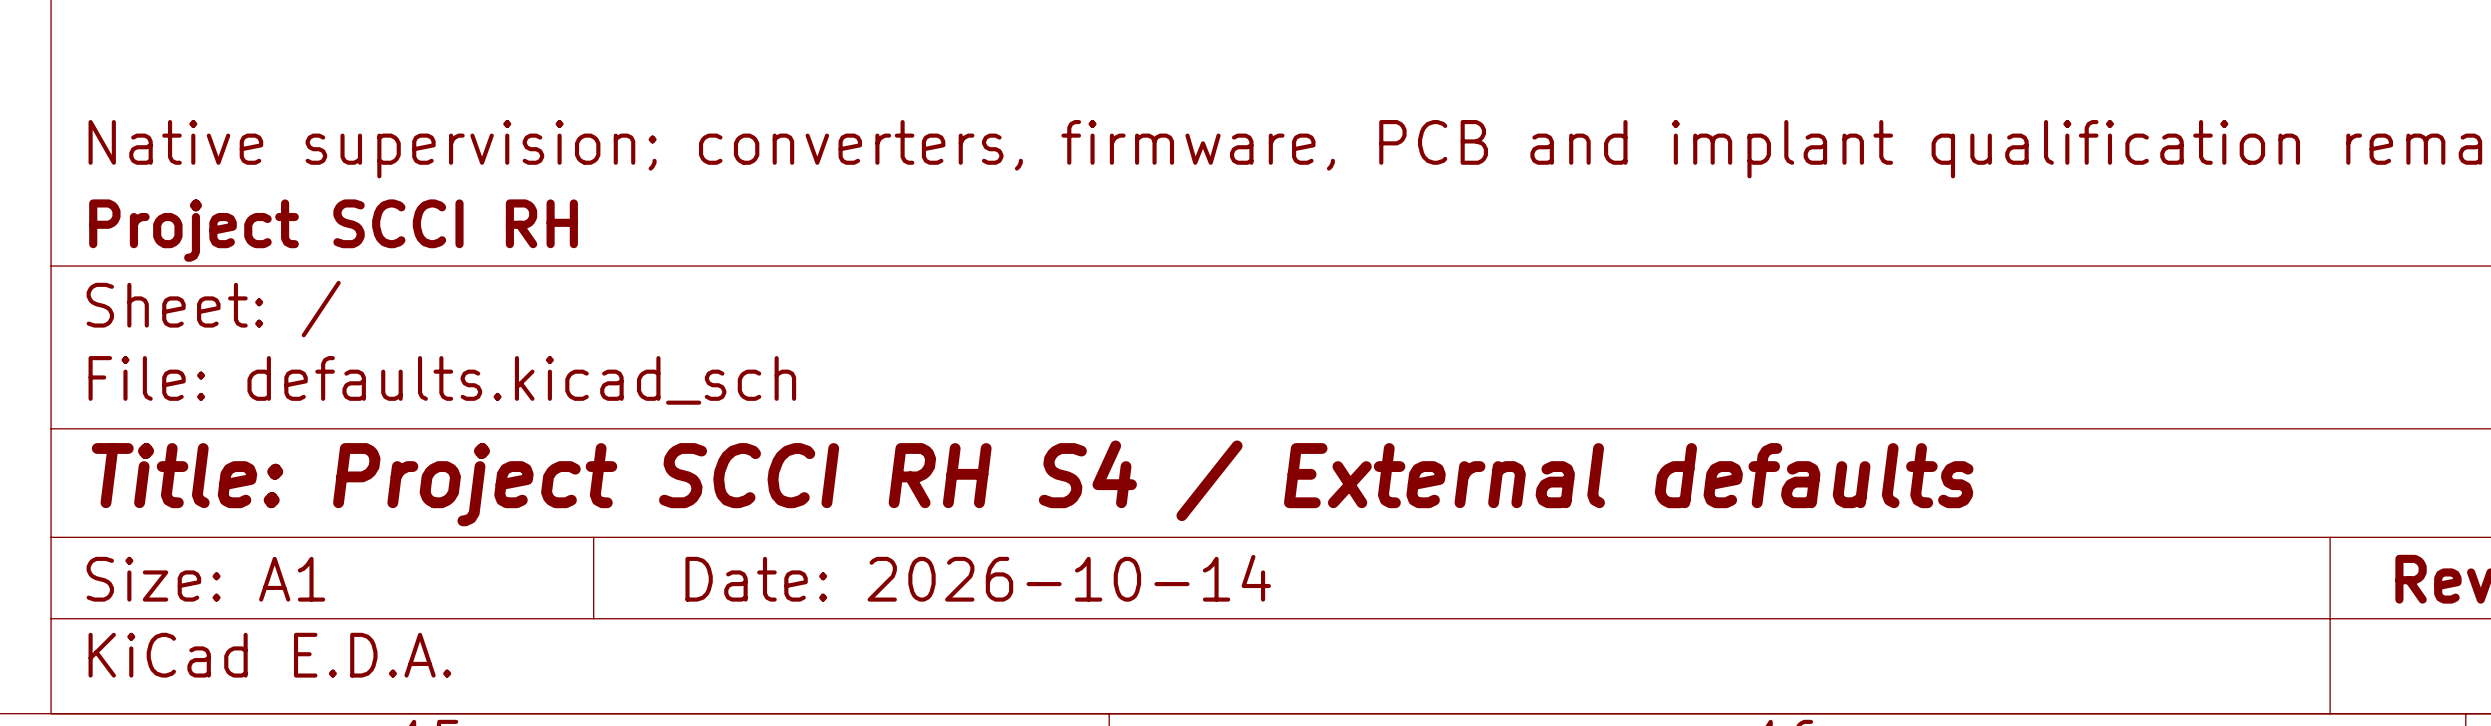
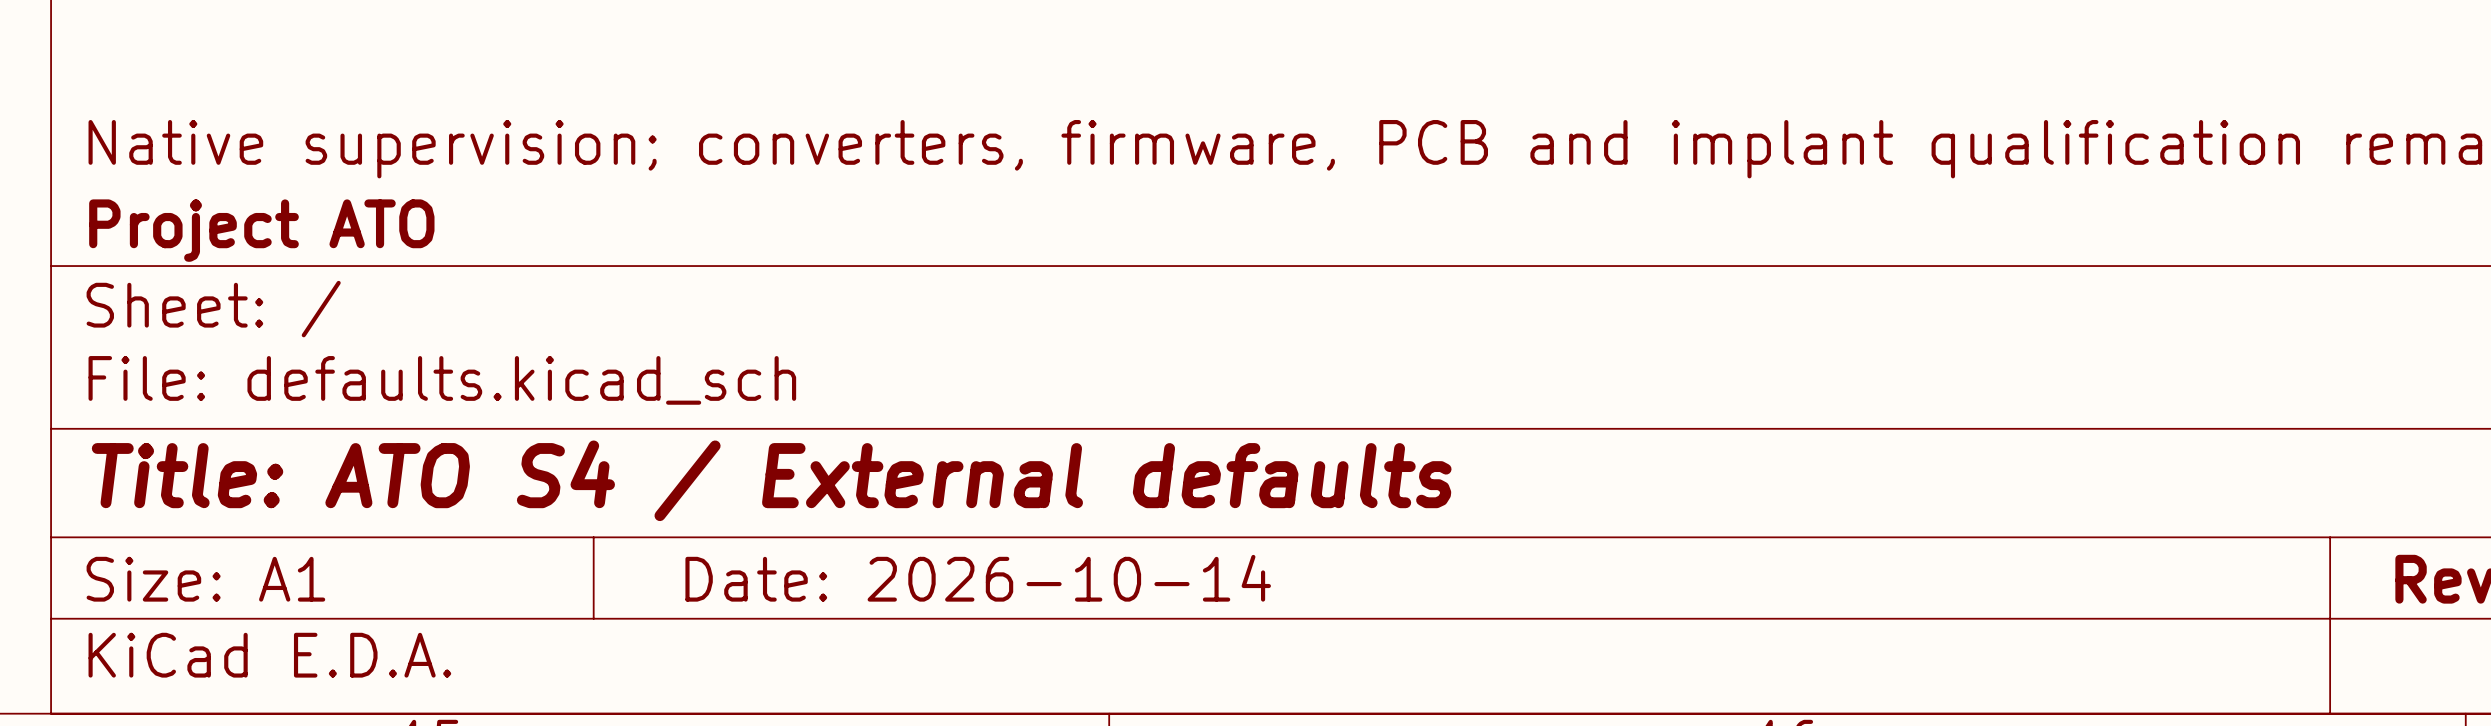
title block: Project SCCI RH (333, 230) -> Project ATO (261, 230)
title block: Title: Project SCCI RH S4 / External defaults (1032, 483) -> Title: ATO S4 / External defaults (771, 480)

